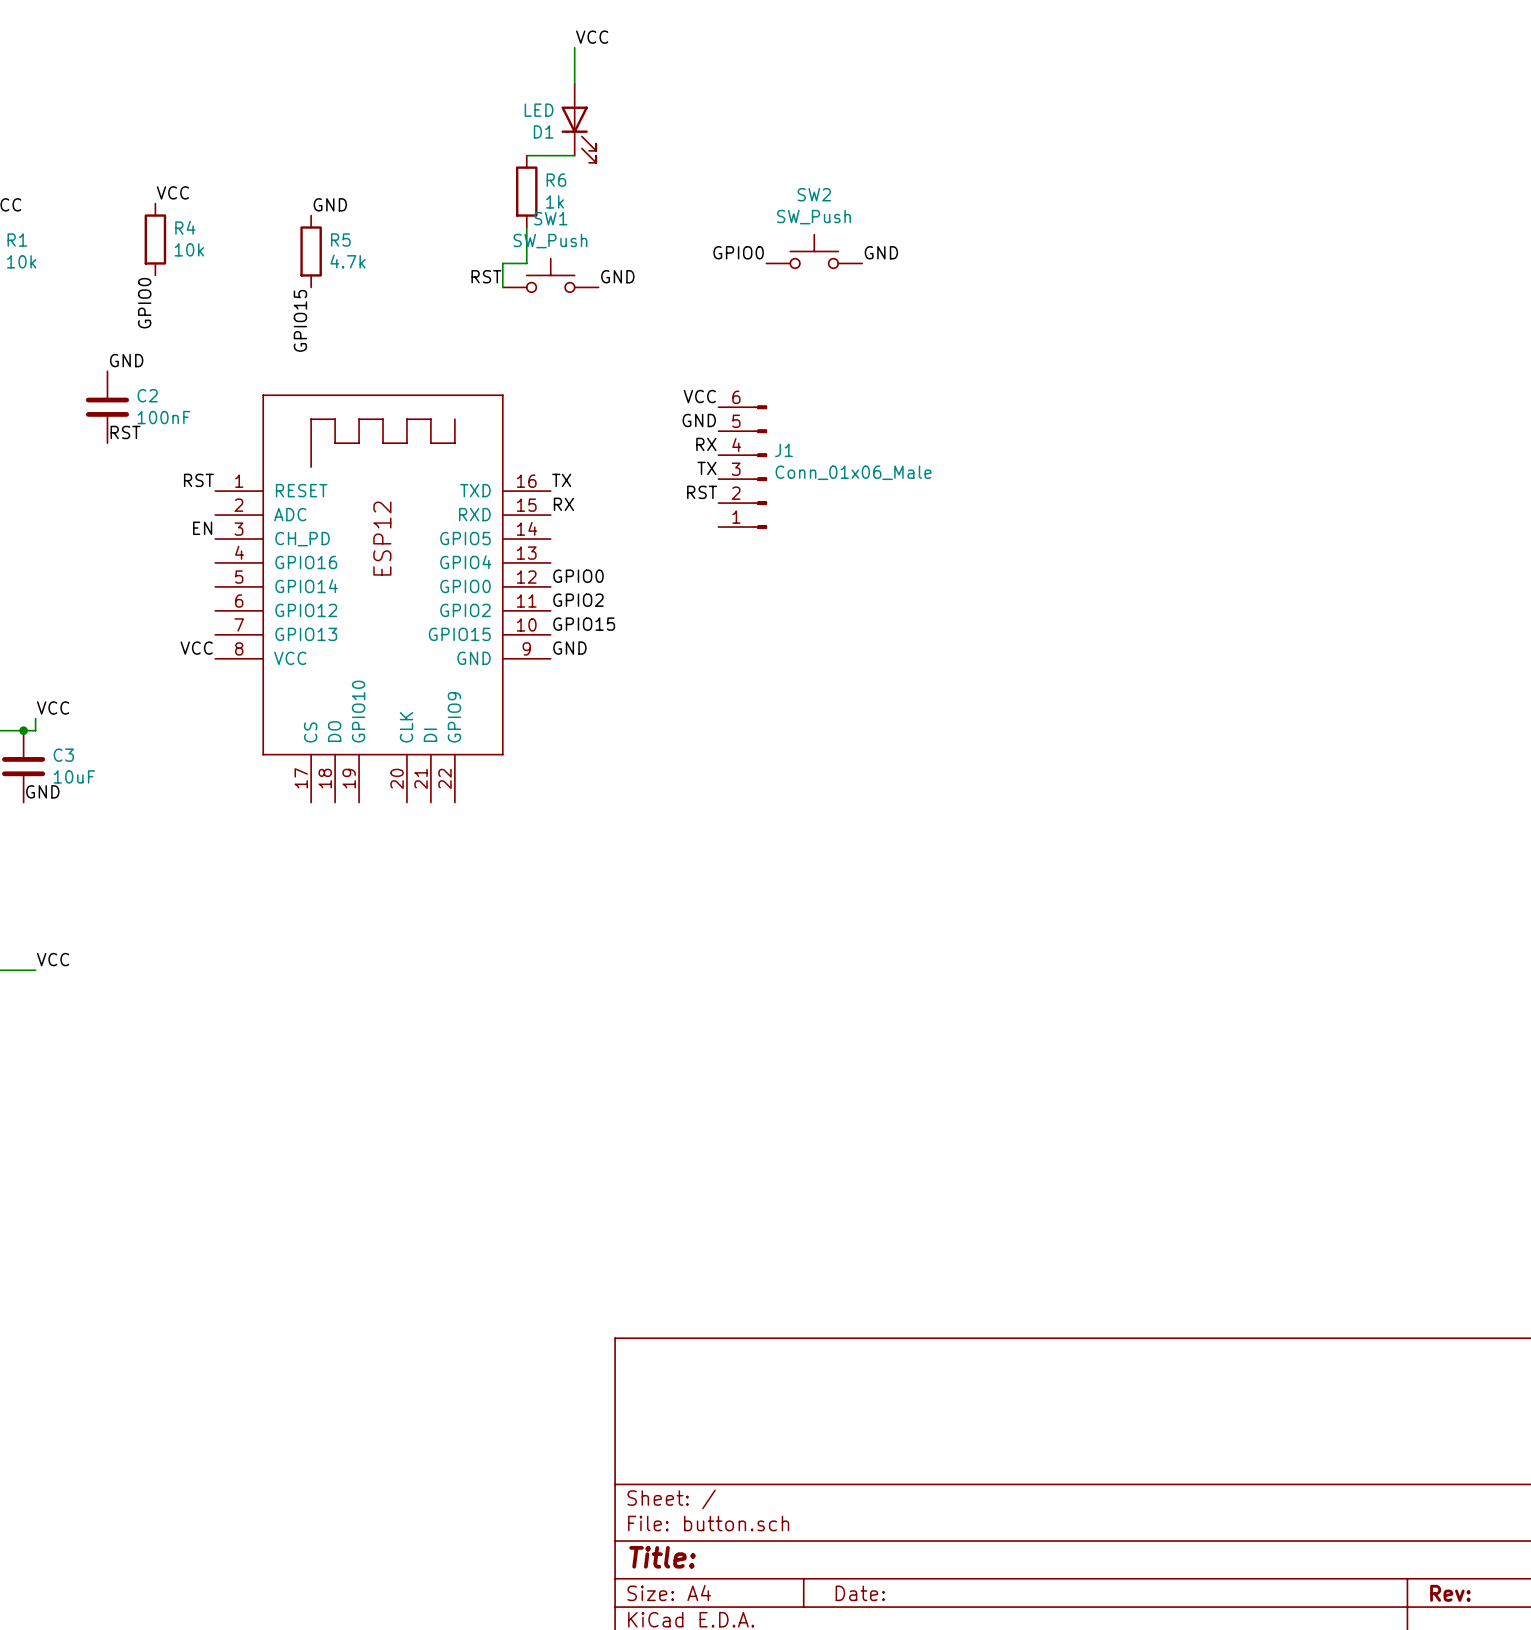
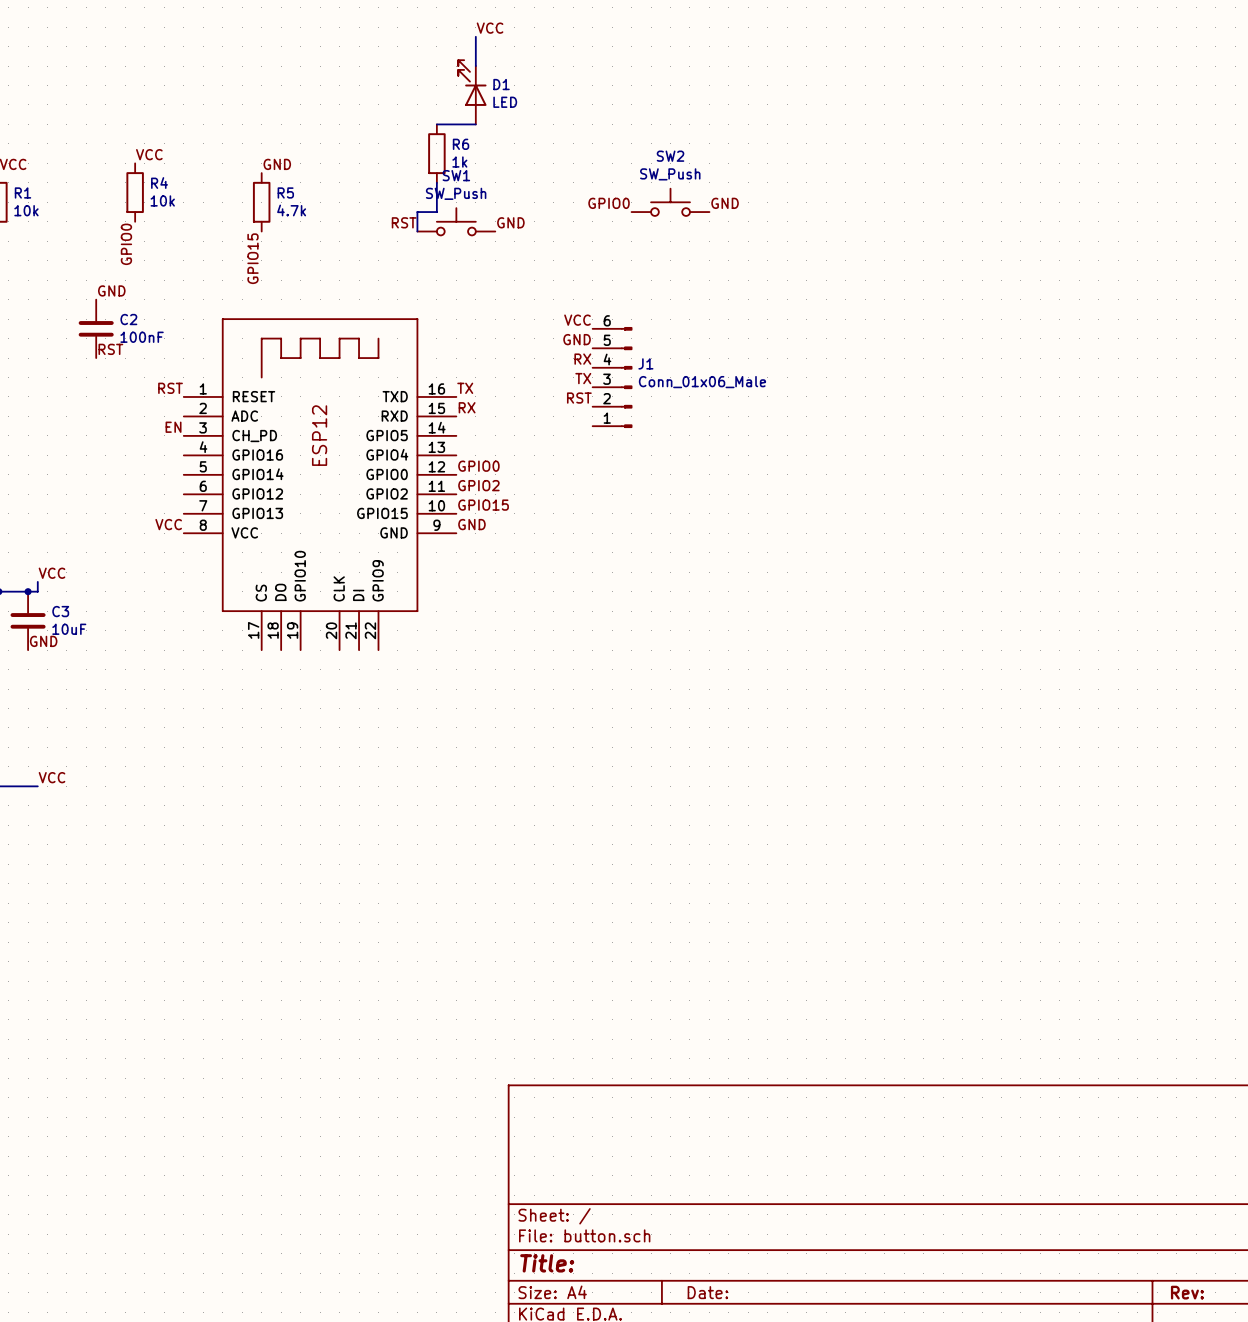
D1 rotation: 0° (578, 134) -> 180° (472, 83)

